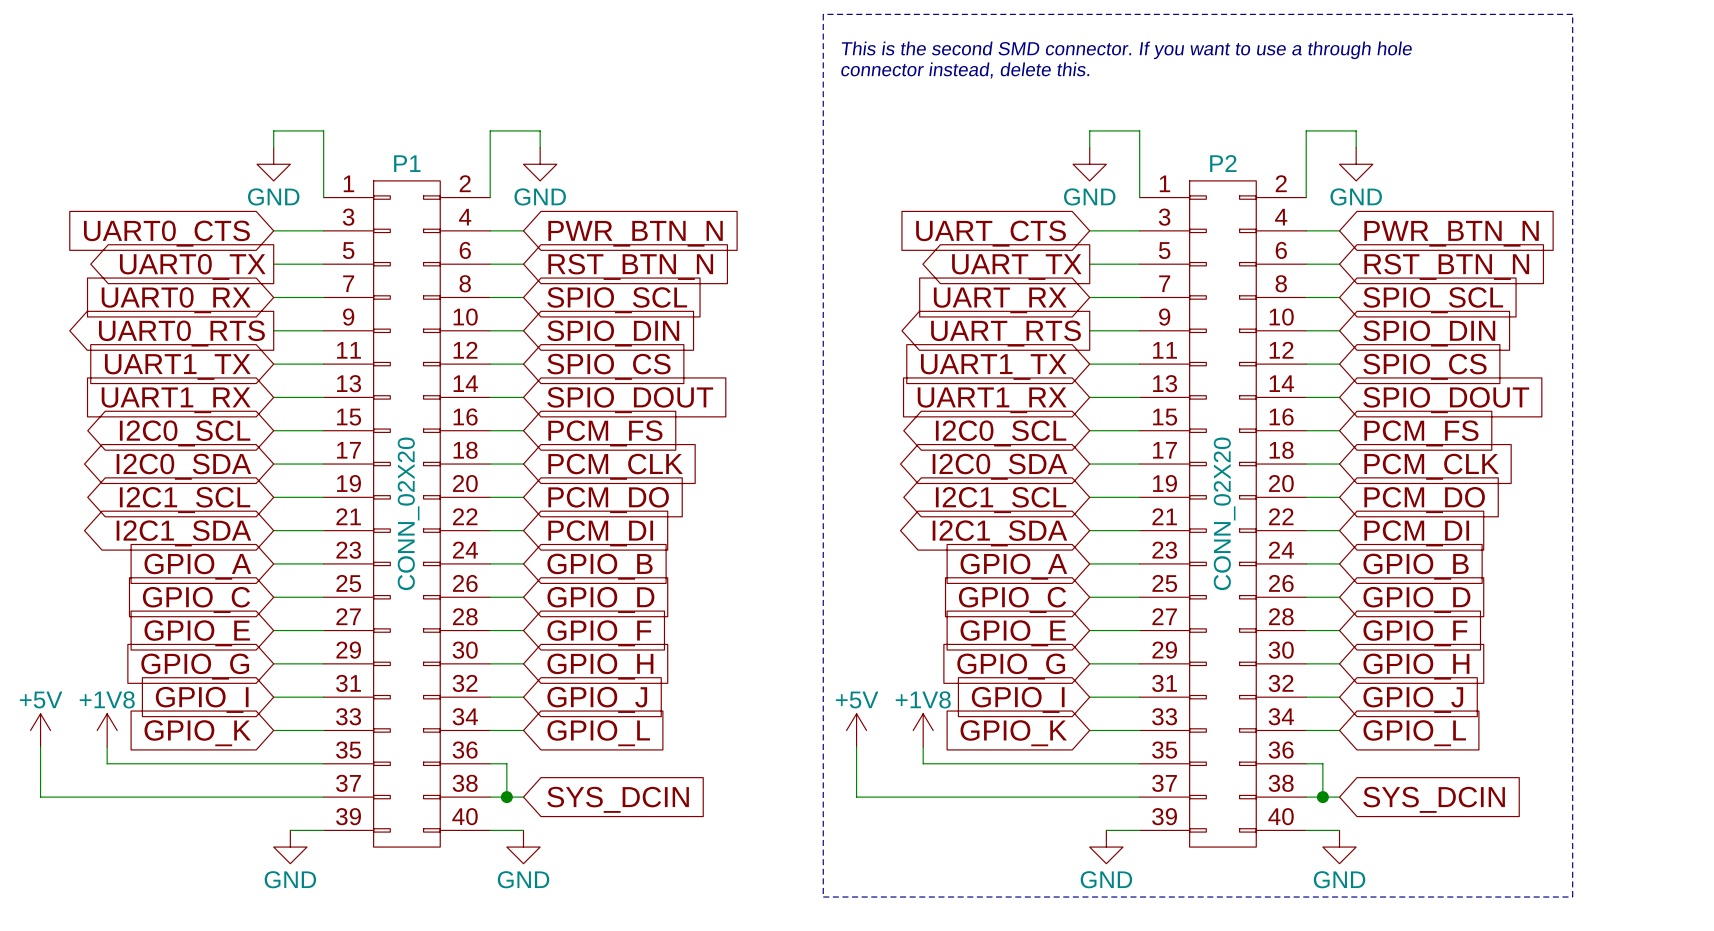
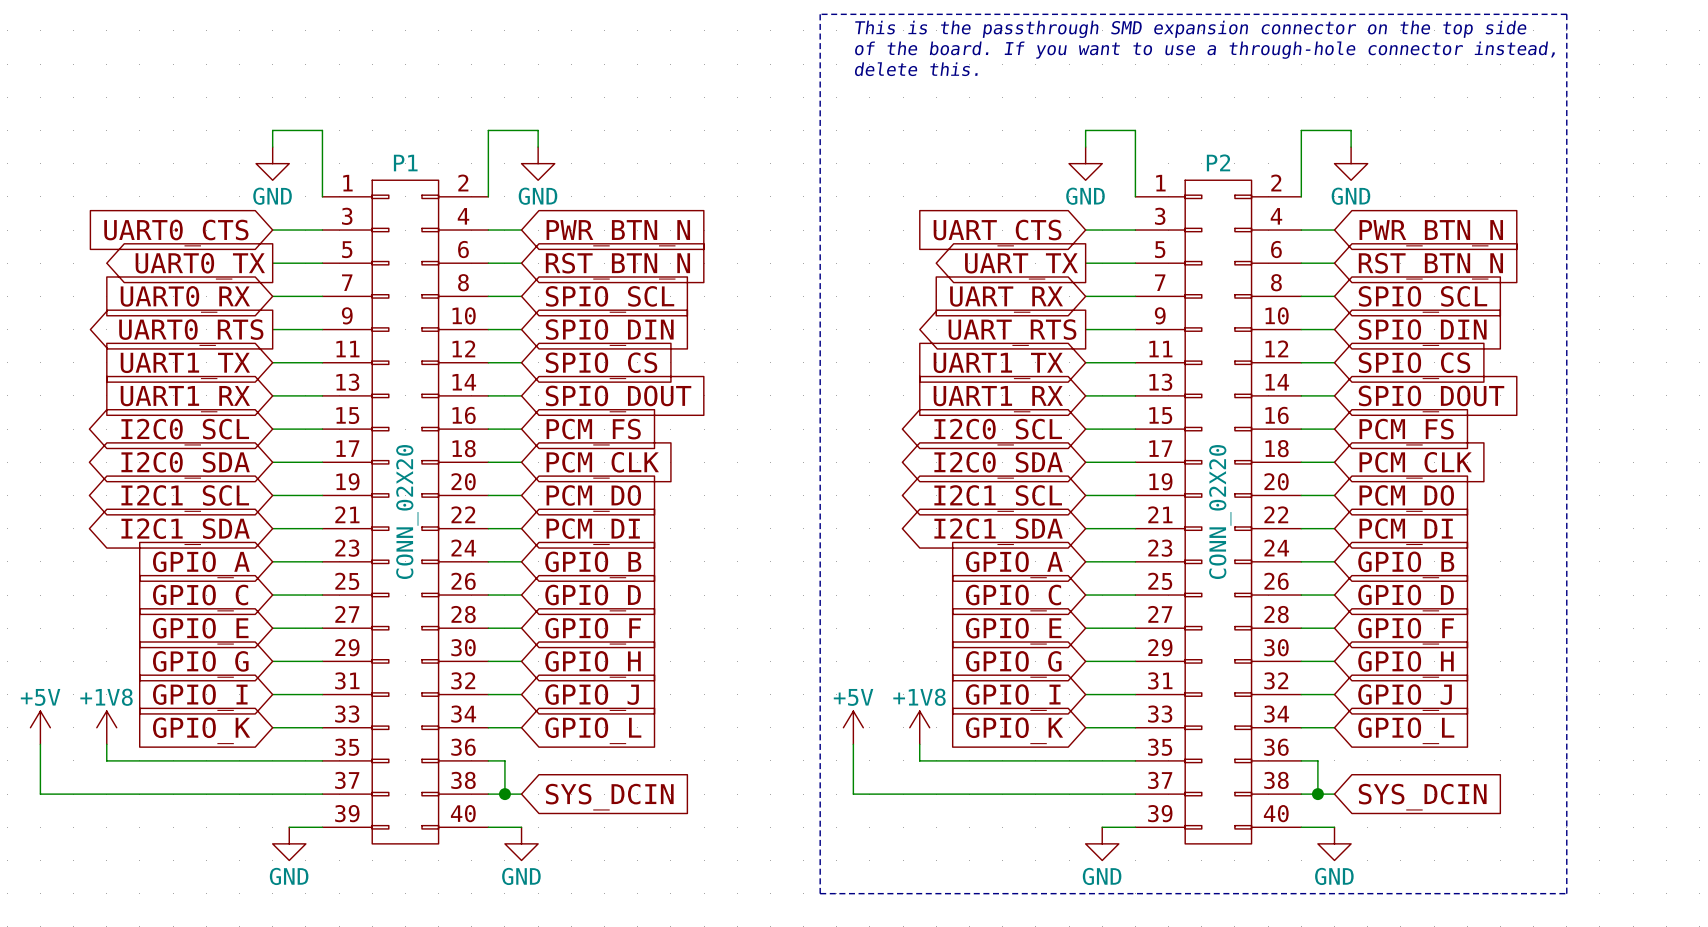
text: none -> This is the passthrough SMD expansion connector on the top side (1190, 29)
text: This is the second SMD connector. If you want to use a through hole (1127, 50) -> of the board. If you want to use a through-hole connector instead, (1204, 50)
text: none -> delete this. (916, 69)
text: connector instead, delete this. (965, 70) -> none

